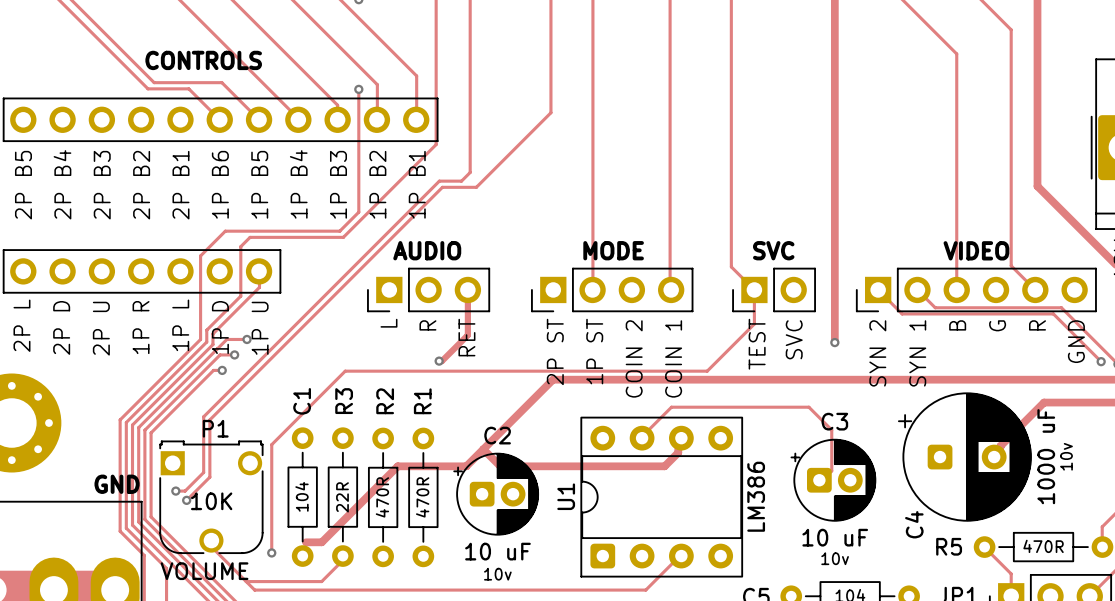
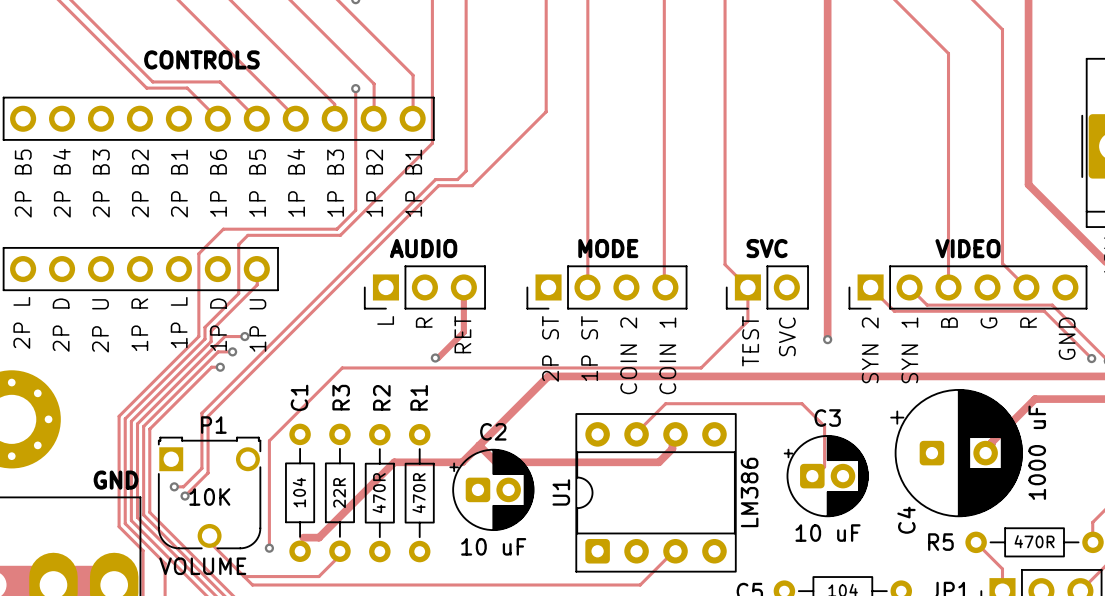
text: 10v (1066, 456) -> none
text: 10v (835, 558) -> none
text: 10v (497, 574) -> none

